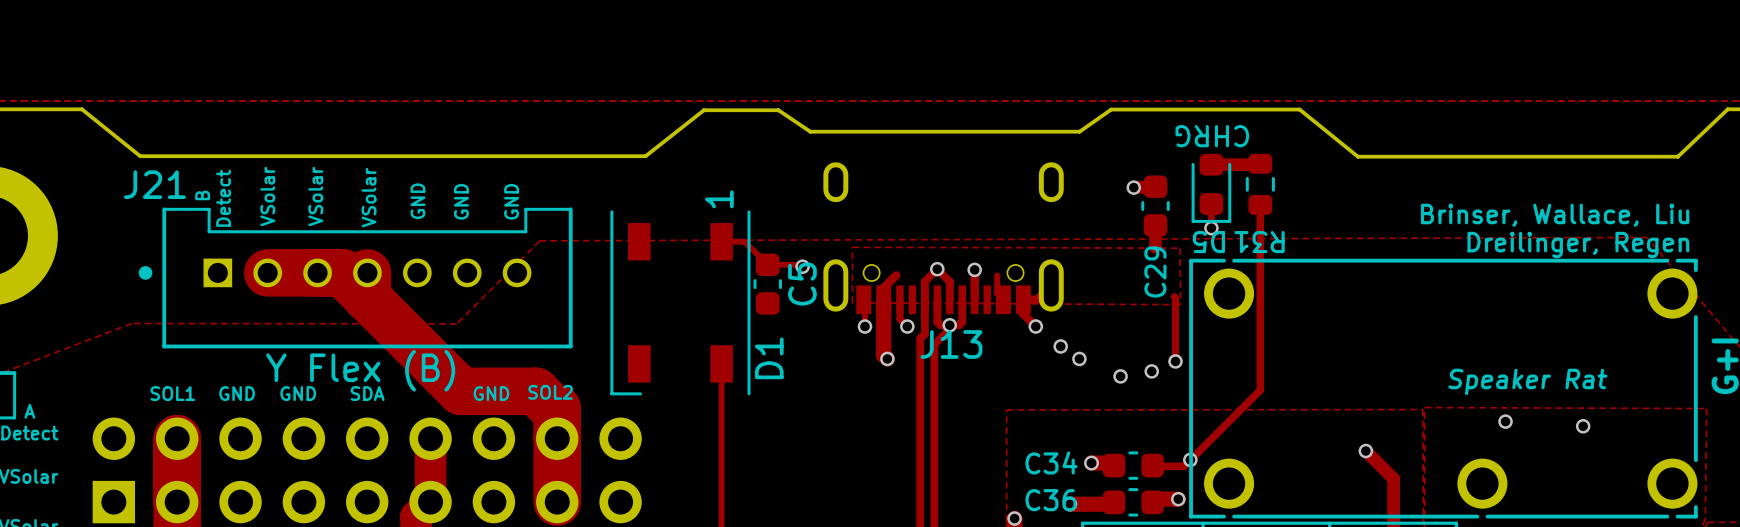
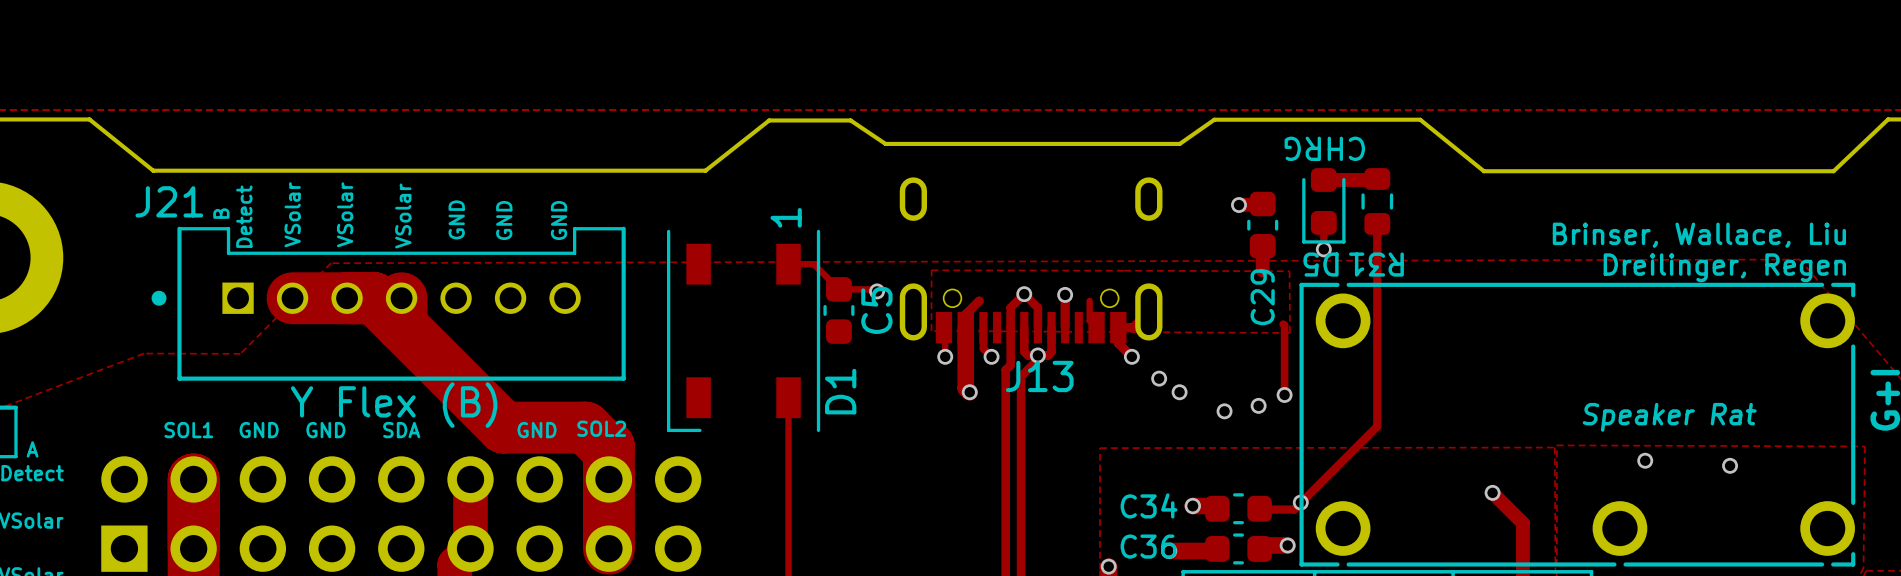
zone outline: (1647, 237) (539, 240) (456, 323) (131, 323) -> (1799, 259) (331, 263) (240, 353) (144, 353)

